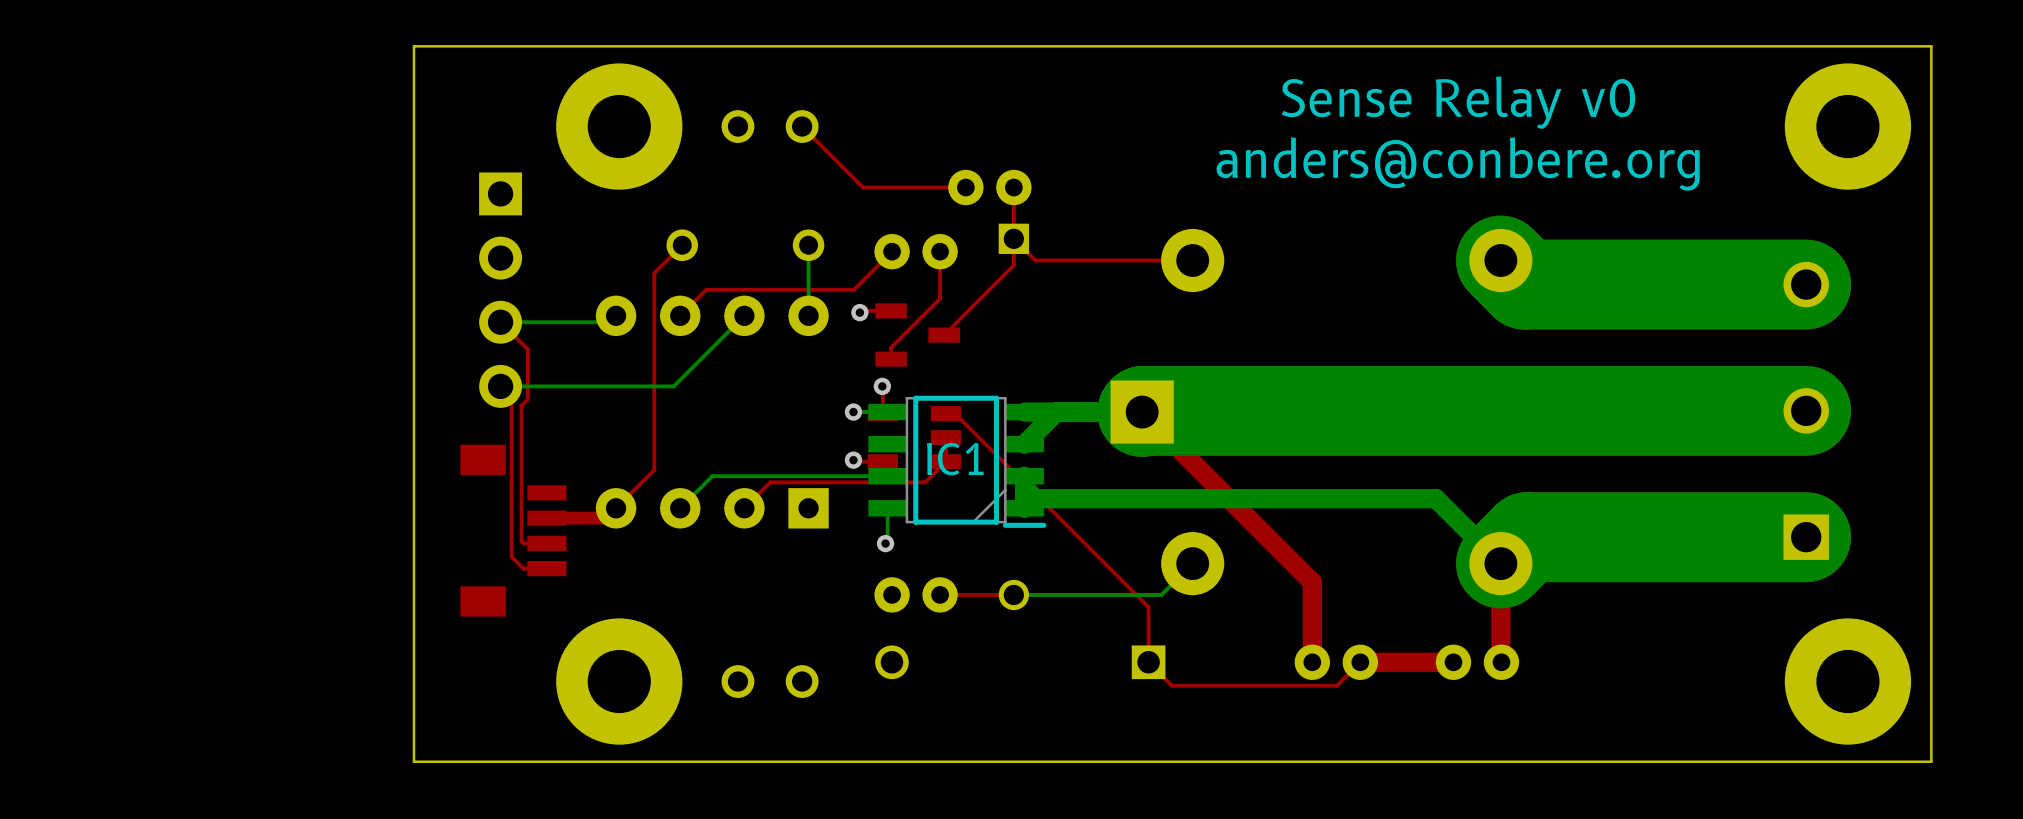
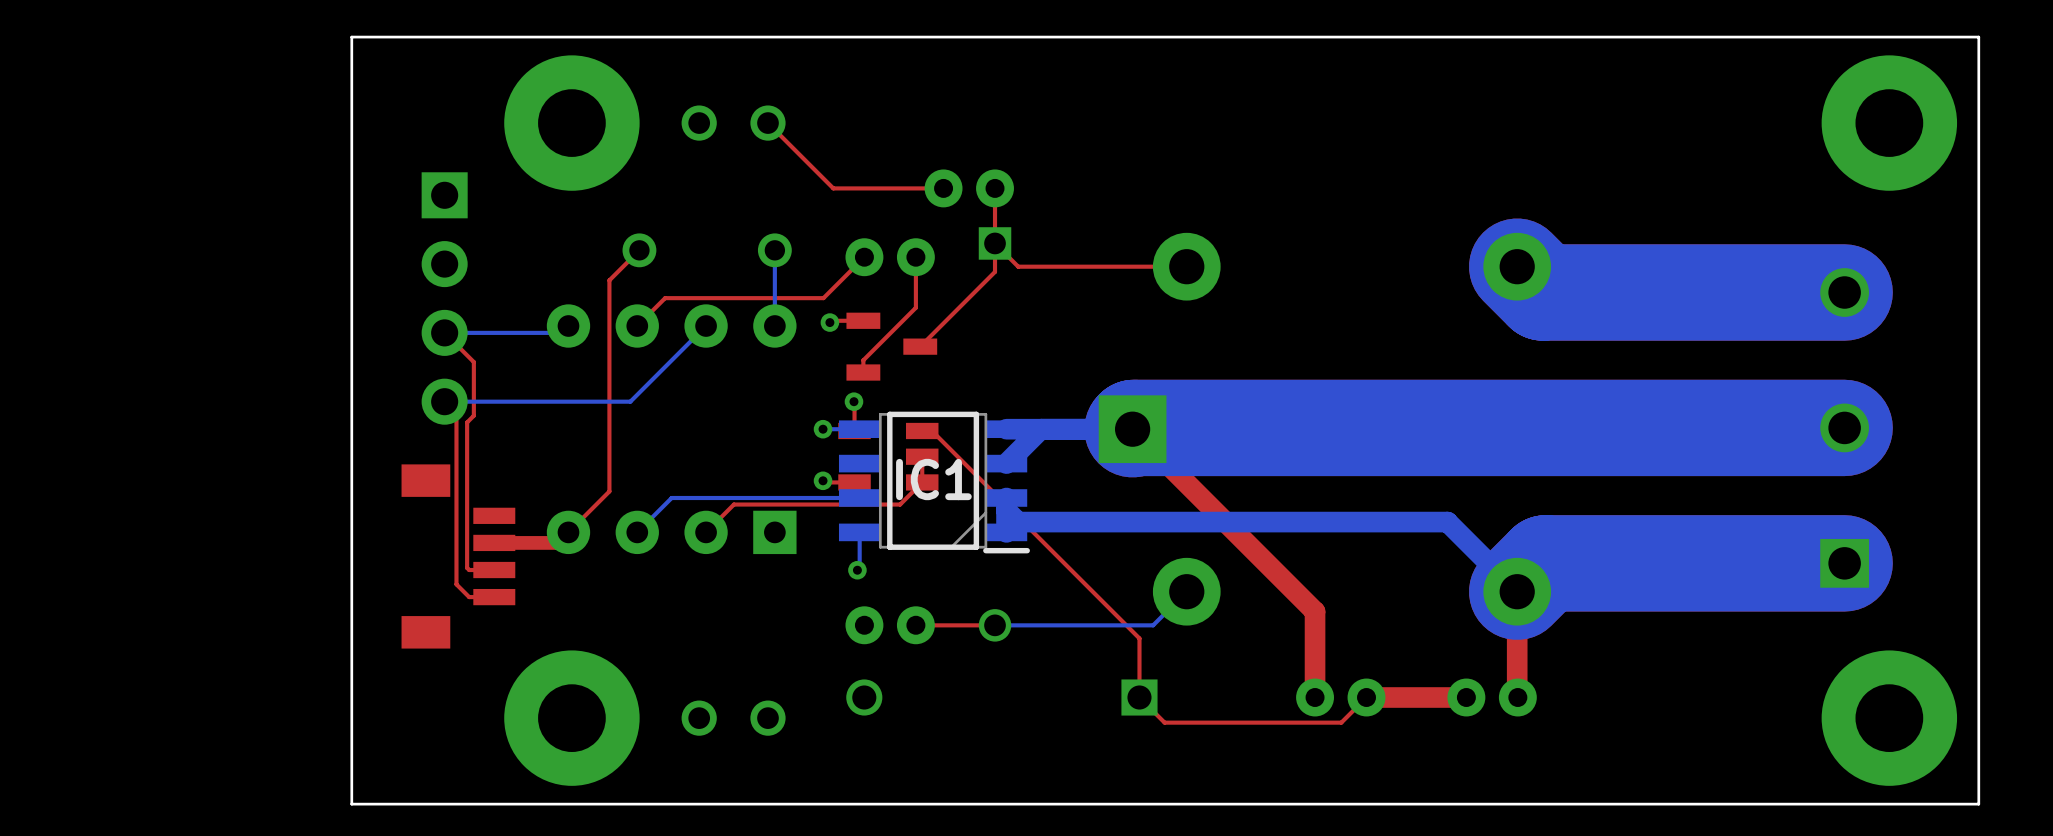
text: Sense Relay v0 (1458, 102) -> none
text: anders@conbere.org (1458, 164) -> none

